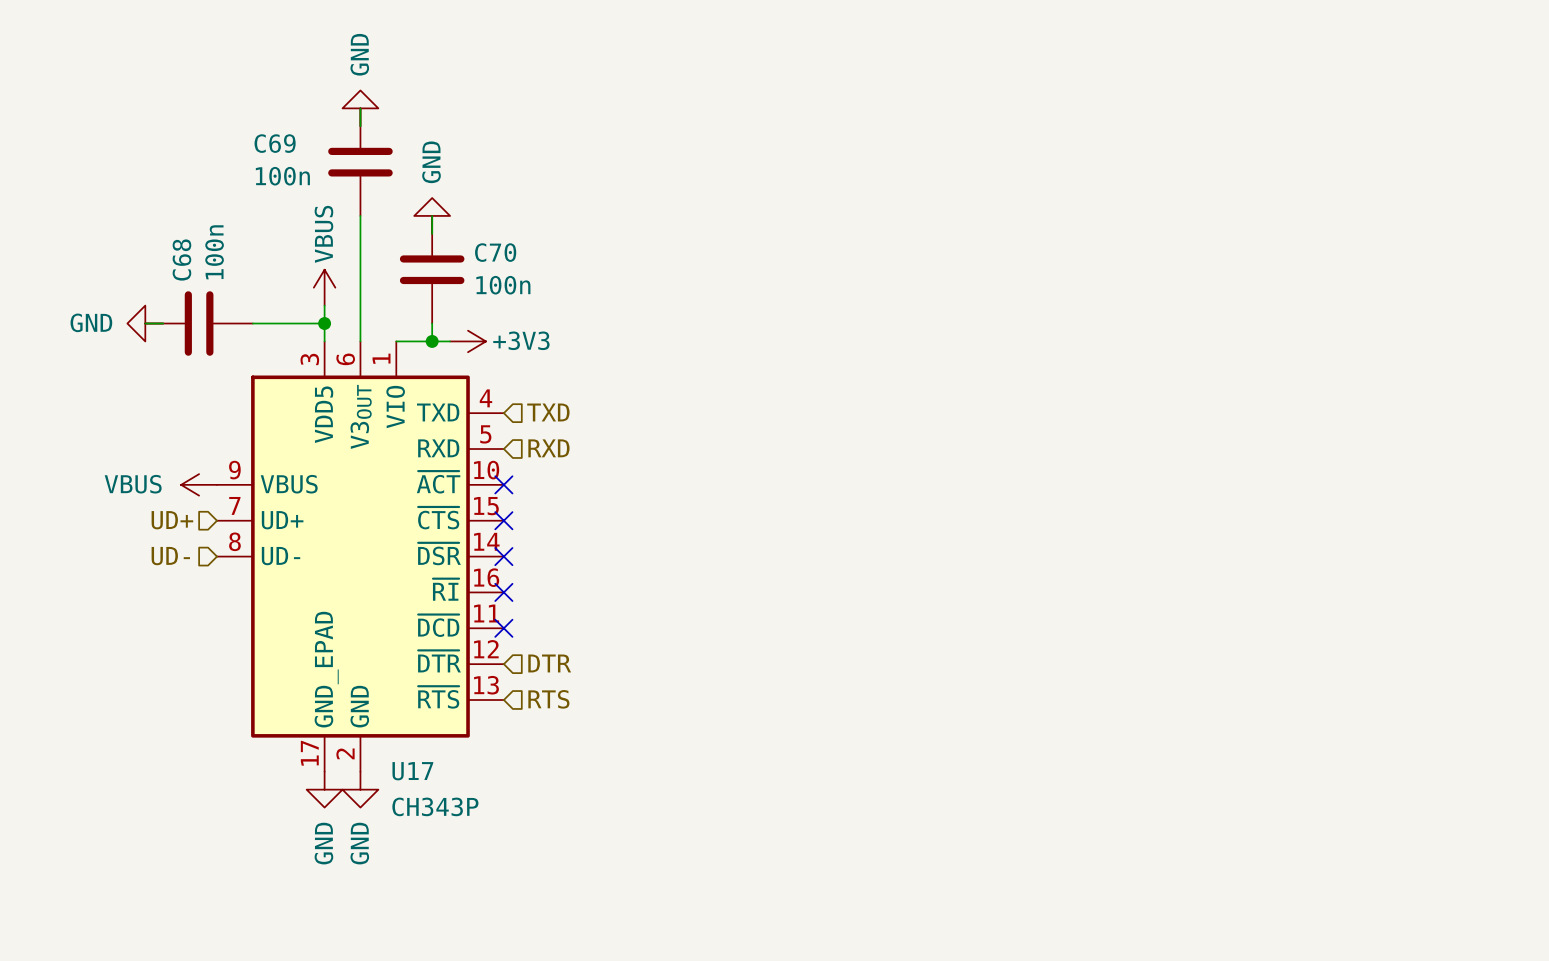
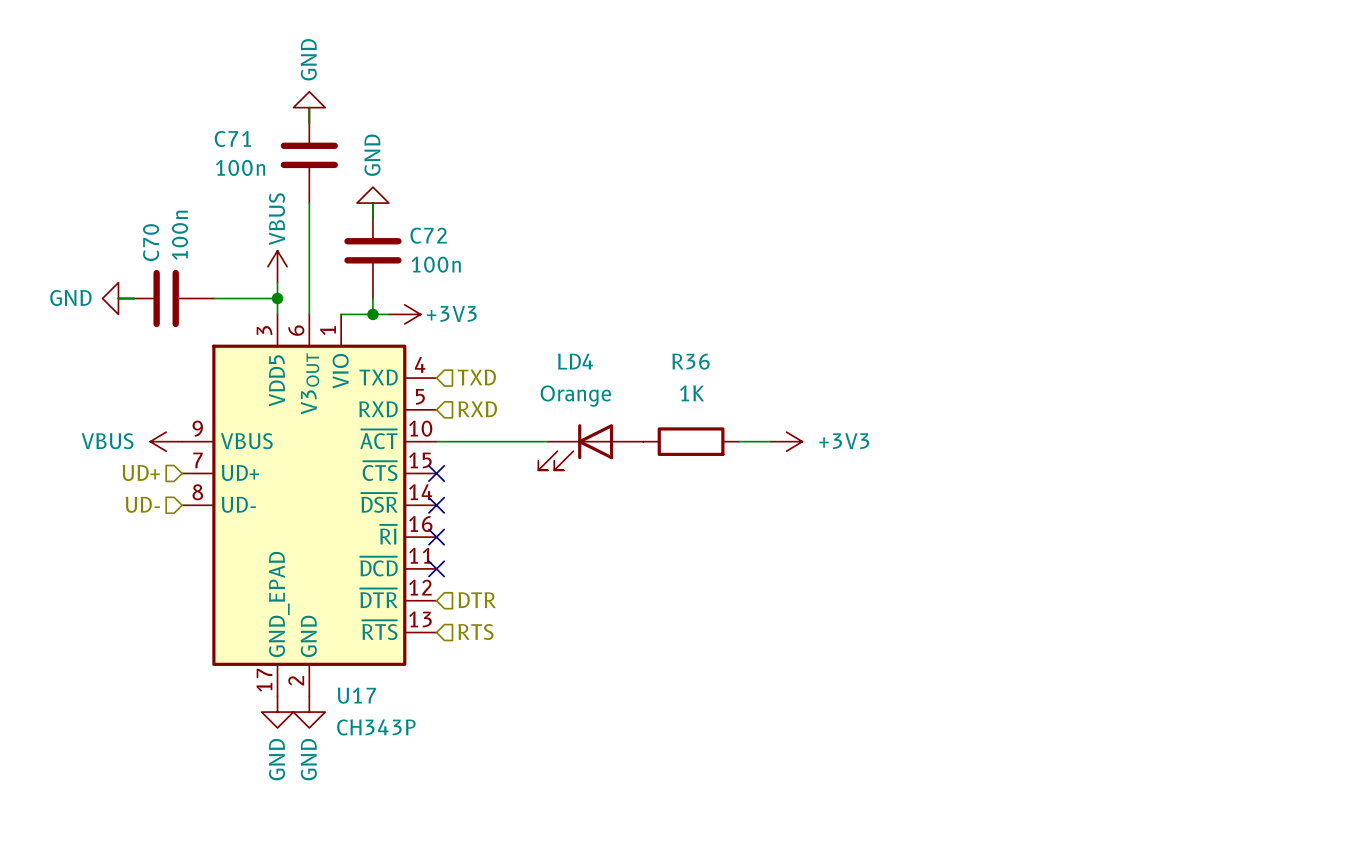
C69 name: C69 (275, 143) -> C71 (232, 138)
C70 name: C70 (495, 252) -> C72 (428, 235)
C68 name: C68 (181, 260) -> C70 (151, 242)
wire: none -> (436, 441) (547, 441)
no-connect mark: (503, 484) -> none
R36: none -> 1K (691, 441)
wire: none -> (738, 441) (770, 441)
power symbol: none -> +3V3 (786, 441)
LD4: none -> Orange (590, 447)

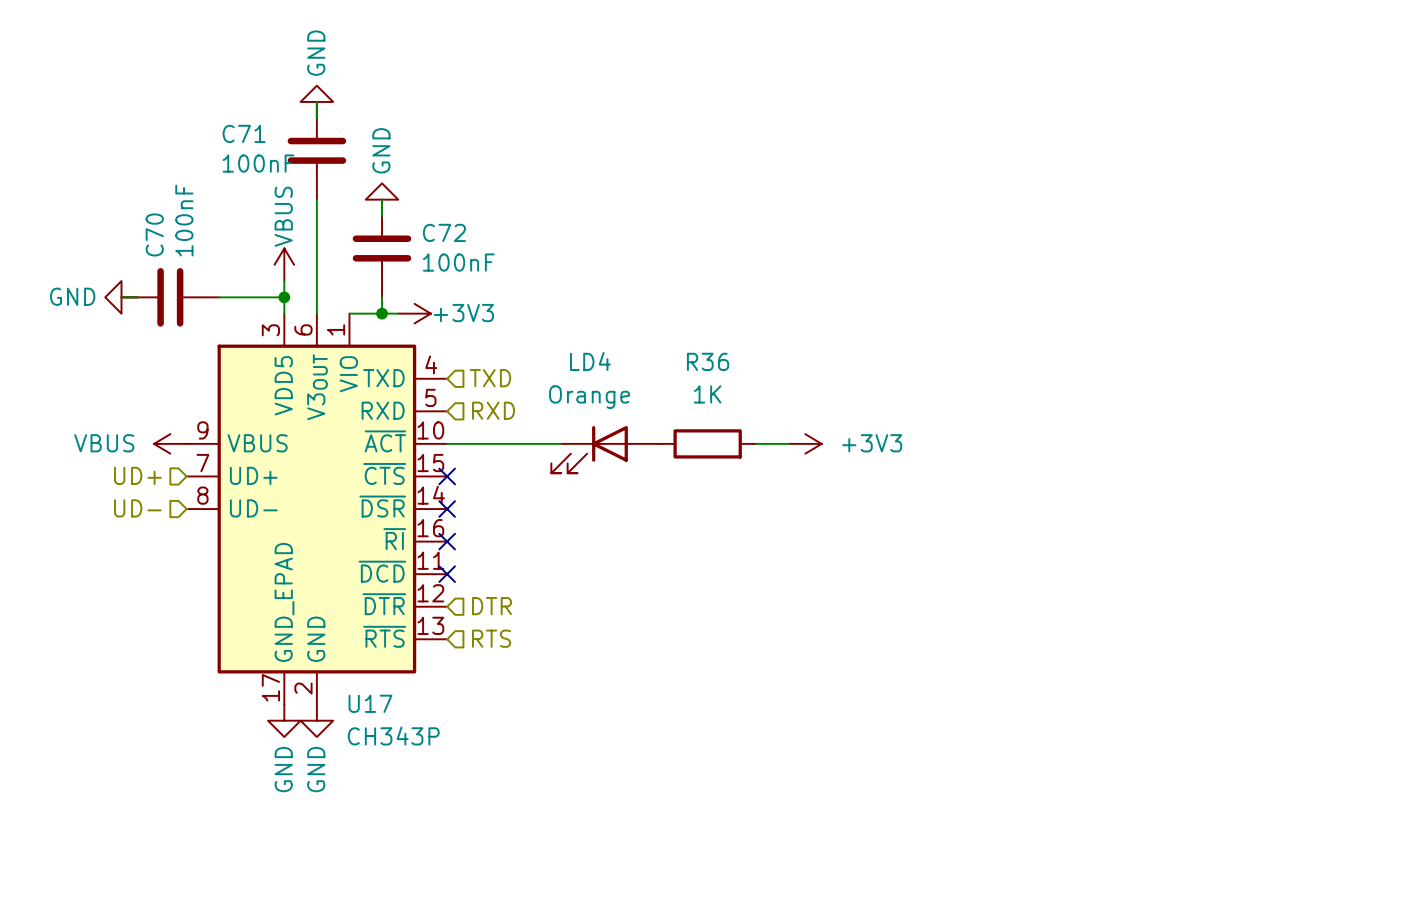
C71 value: 100n (240, 167) -> 100nF (258, 163)
C70 value: 100n (179, 235) -> 100nF (184, 220)
C72 value: 100n (436, 264) -> 100nF (458, 262)

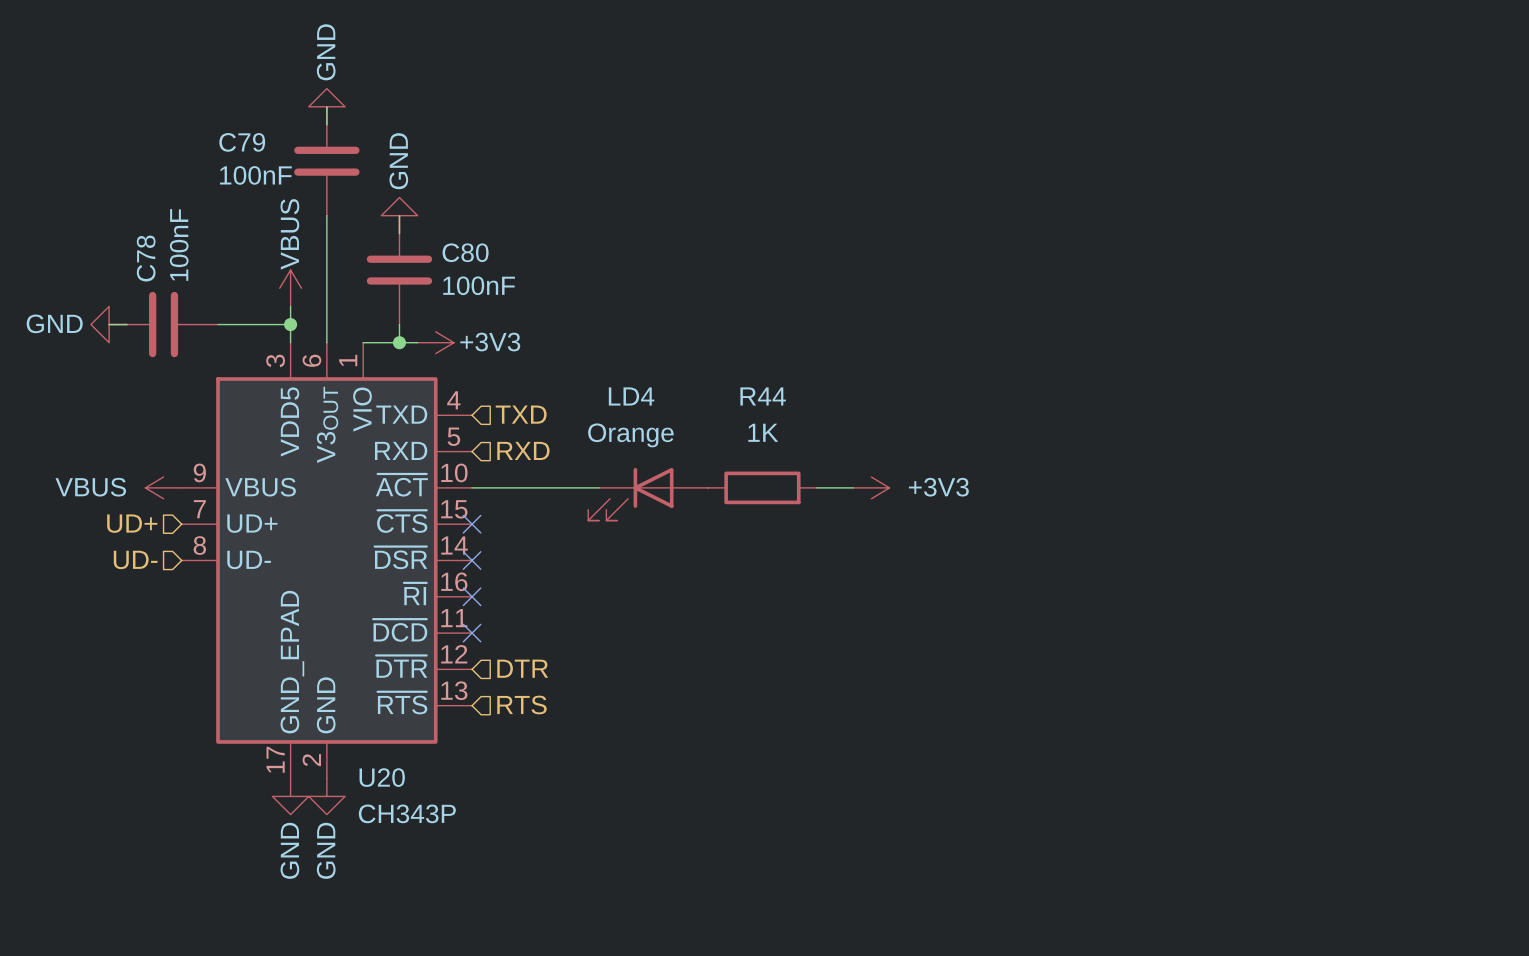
C71 name: C71 (244, 133) -> C79 (242, 142)
C72 name: C72 (444, 232) -> C80 (465, 252)
C70 name: C70 (154, 234) -> C78 (146, 258)
R36 name: R36 (708, 361) -> R44 (763, 396)
U17 name: U17 (370, 703) -> U20 (382, 777)

